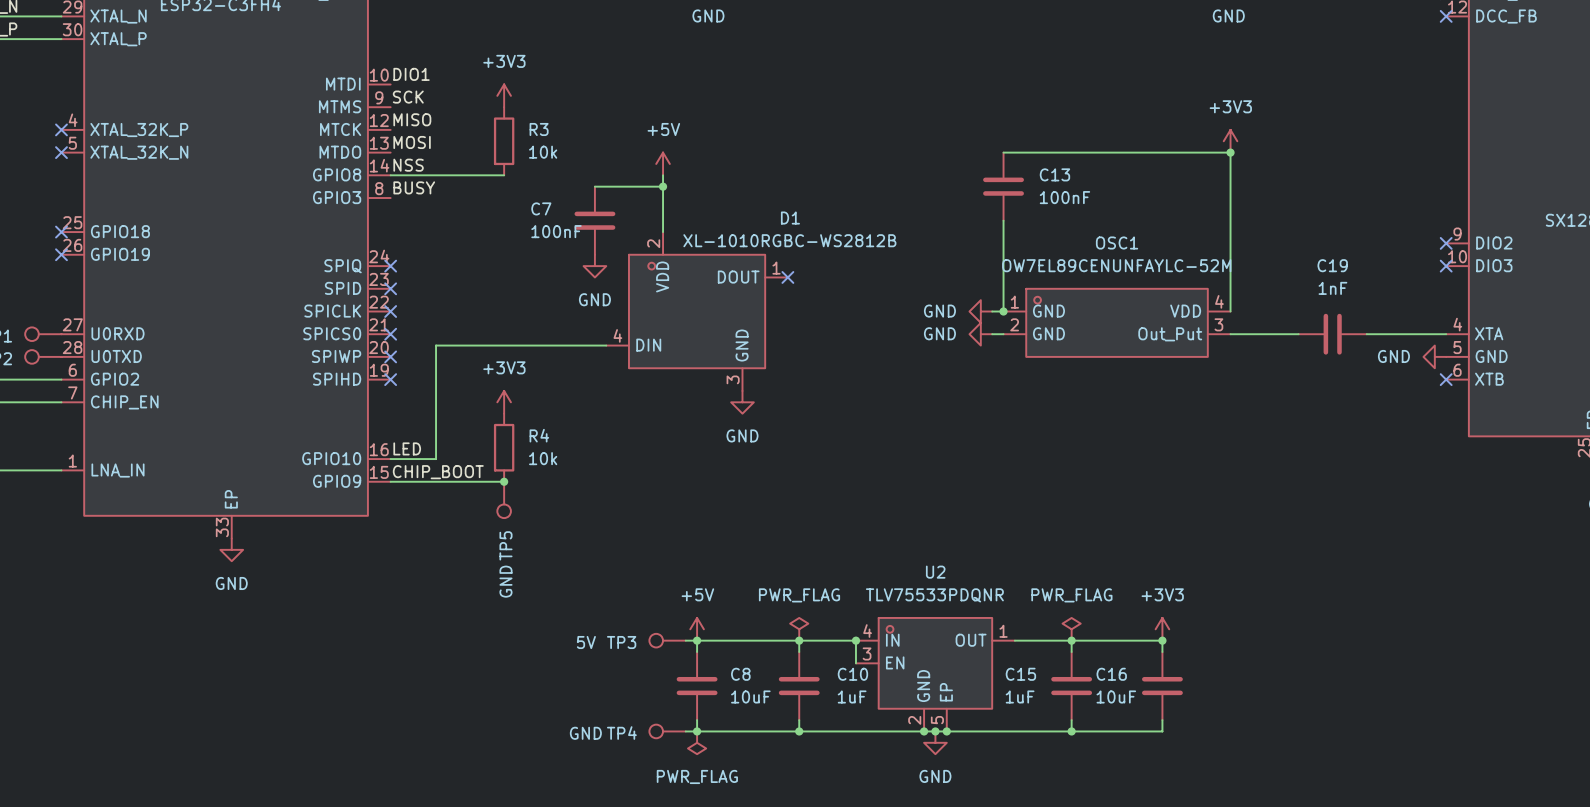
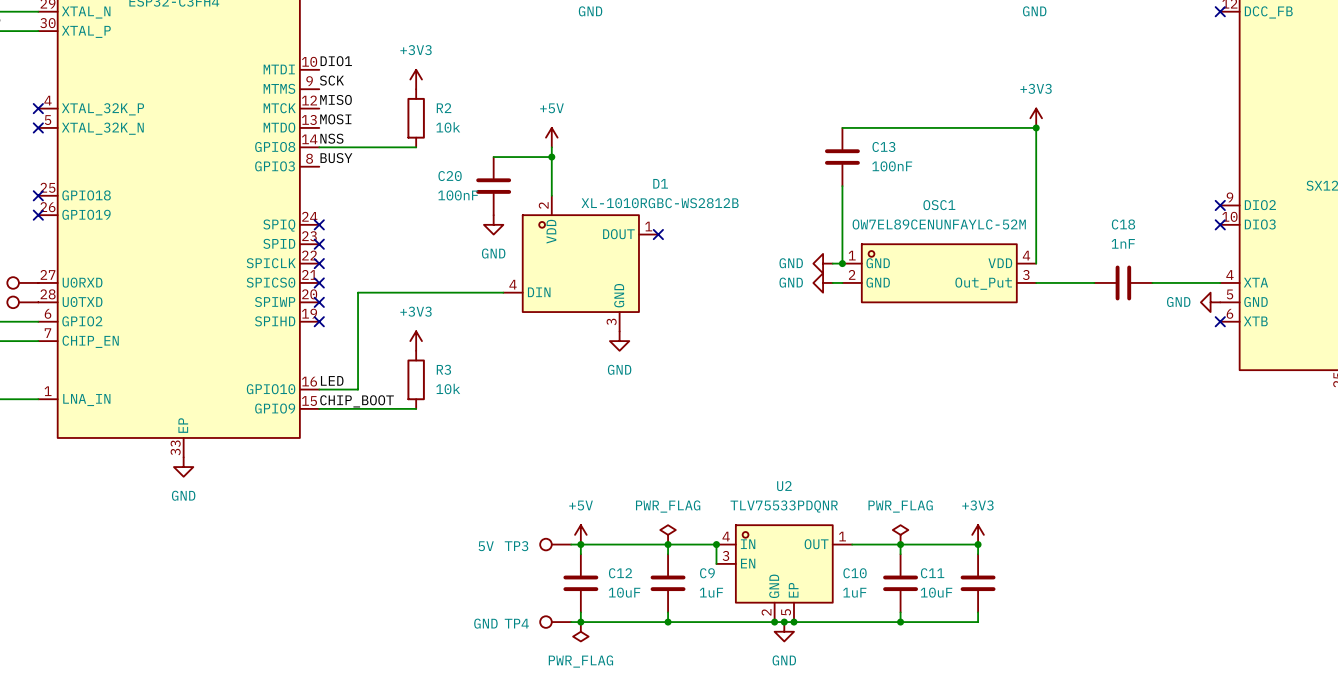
R3 name: R3 (539, 129) -> R2 (444, 108)
C7 name: C7 (541, 208) -> C20 (450, 176)
C19 name: C19 (1332, 265) -> C18 (1123, 224)
R4 name: R4 (539, 435) -> R3 (443, 369)
junction: (504, 481) -> none
TP5: GND (504, 499) -> none
C8 name: C8 (740, 674) -> C12 (620, 573)
C10 name: C10 (852, 674) -> C9 (707, 573)
C15 name: C15 (1020, 674) -> C10 (855, 573)
C16 name: C16 (1111, 674) -> C11 (932, 573)

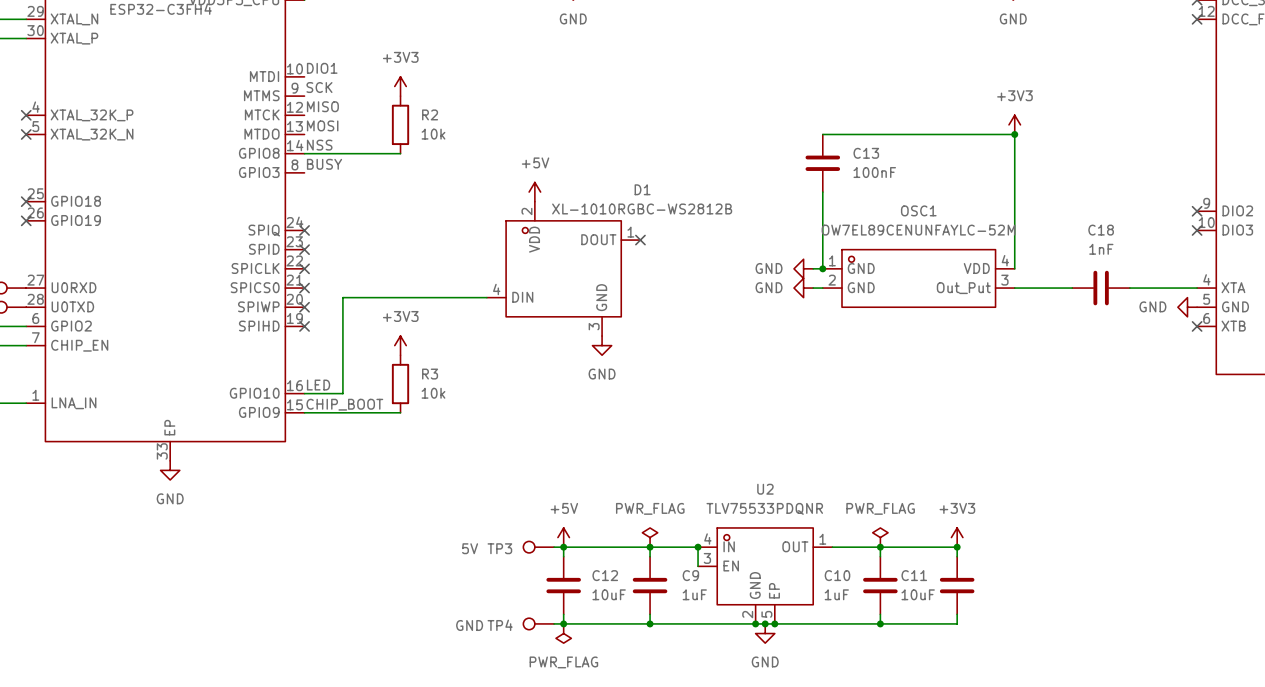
power symbol position: +5V (551, 137) -> +5V (534, 192)
wire: (551, 147) (551, 195) -> none
wire: (493, 157) (551, 157) -> none
junction: (551, 157) -> none
C20: 100nF (493, 186) -> none
power symbol: GND (493, 224) -> none

